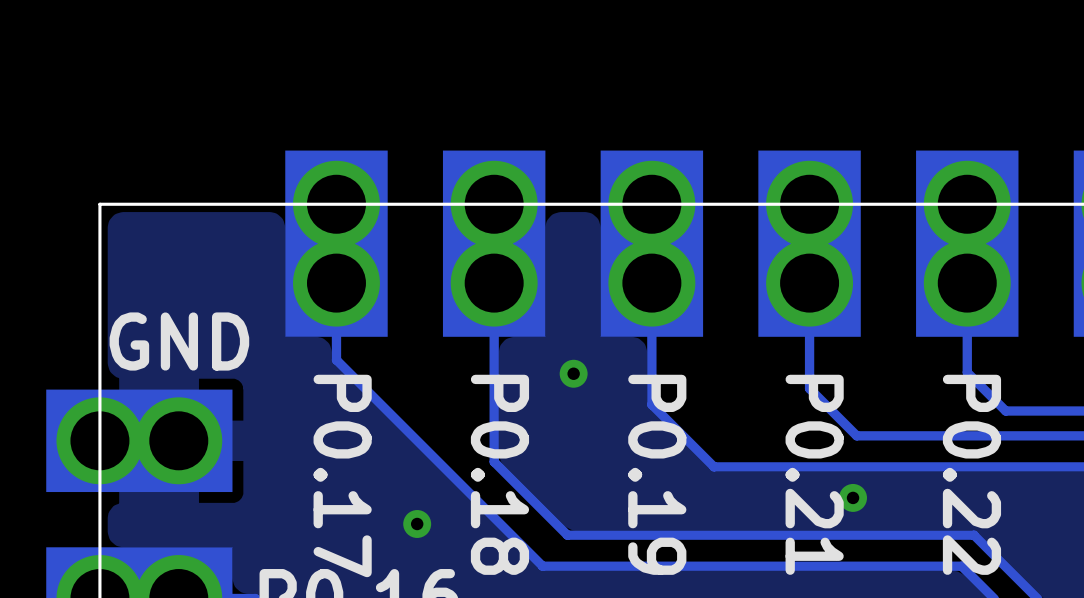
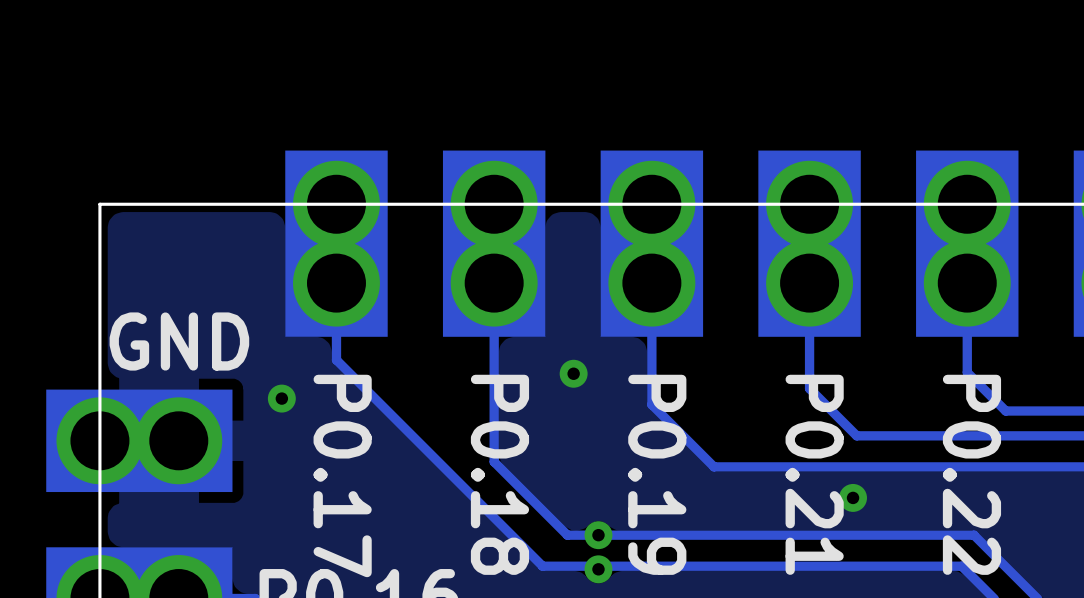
via: none -> (281, 398)
via: (417, 524) -> none
via: none -> (598, 535)
via: none -> (598, 569)

